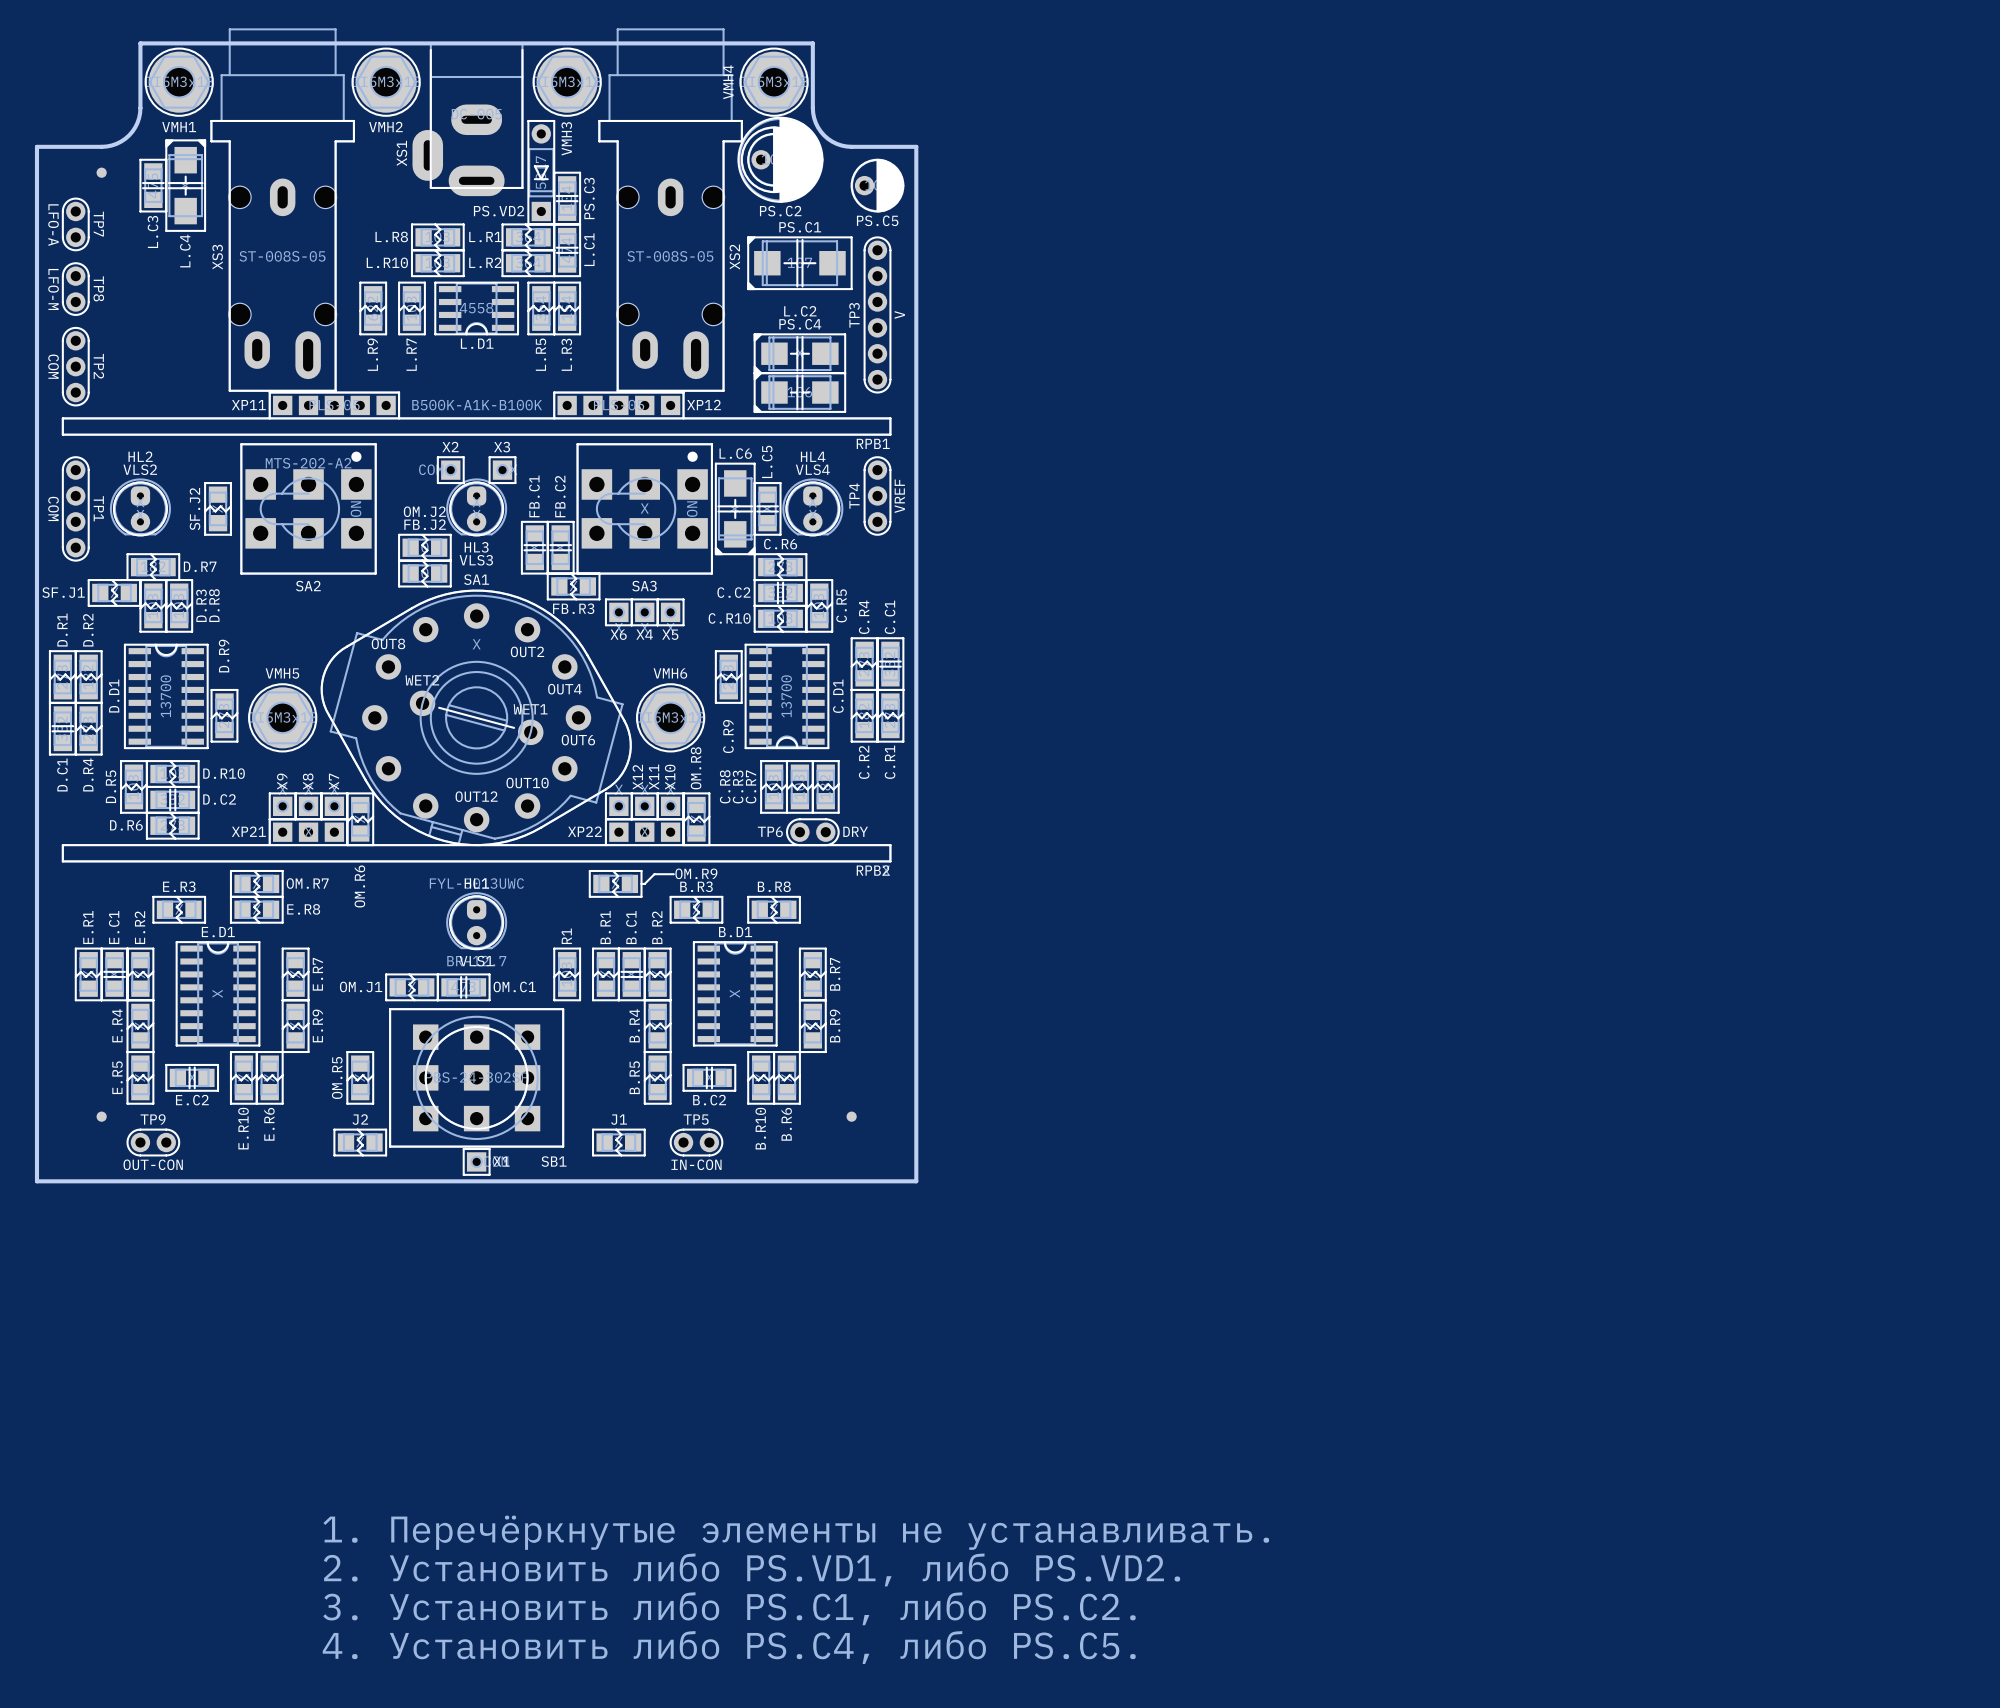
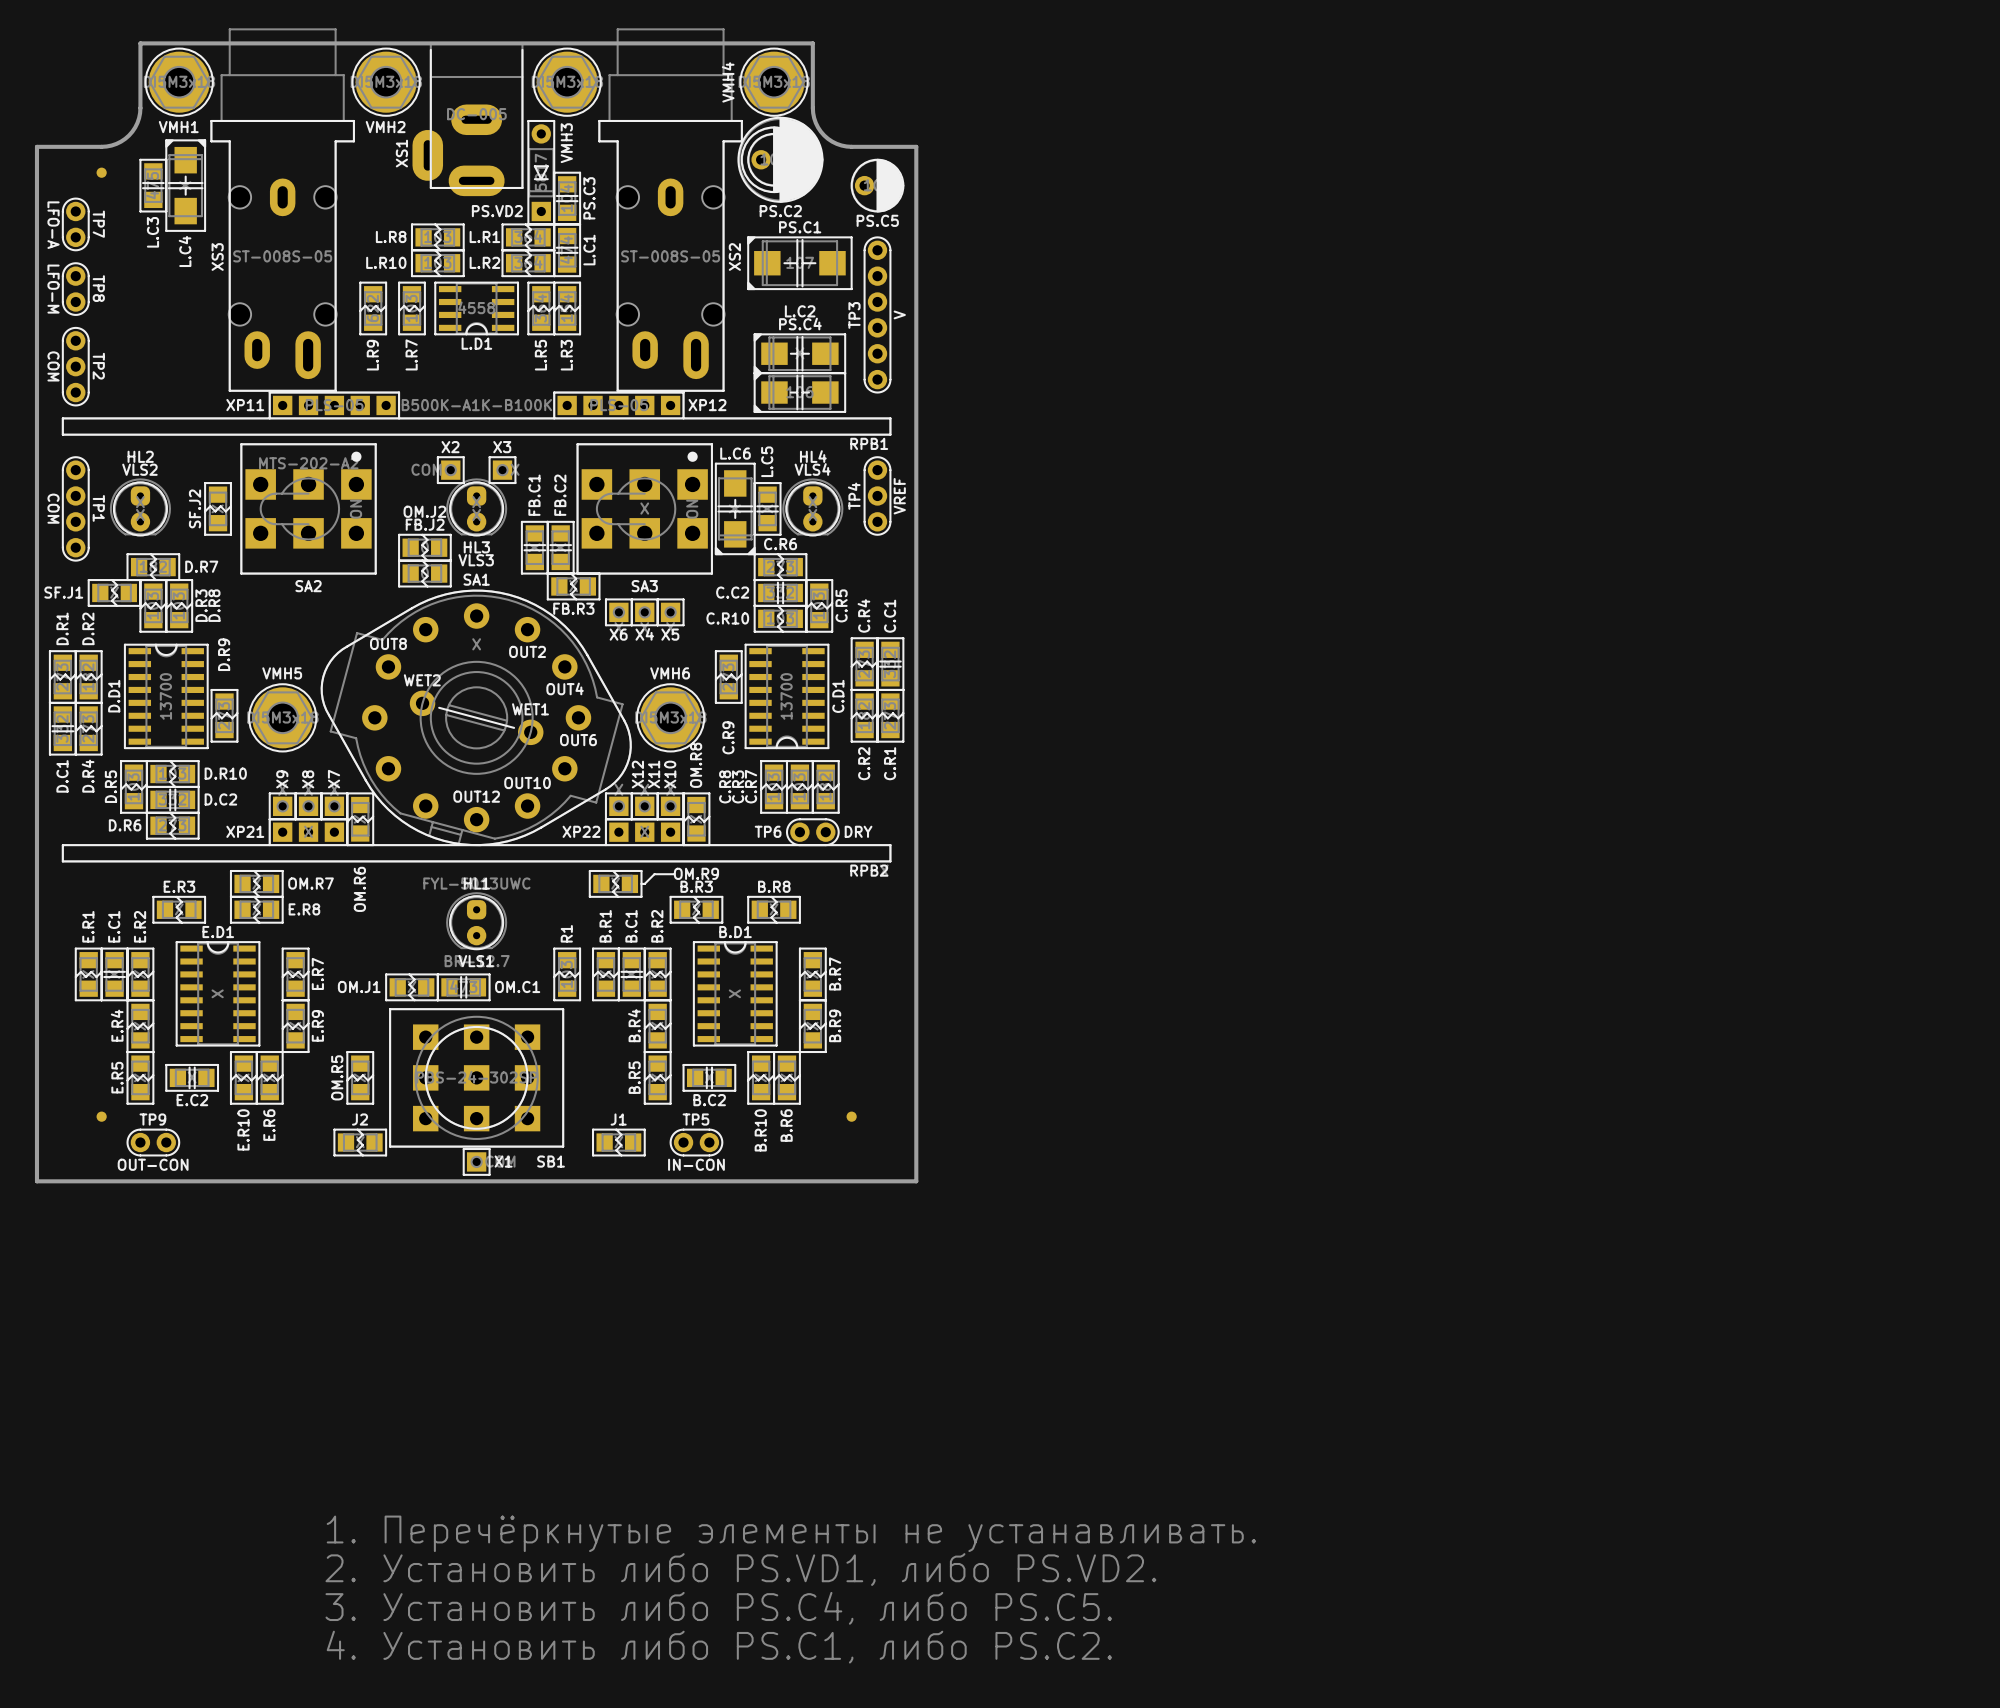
text: 3. Установить либо PS.C1, либо PS.C2. (729, 1608) -> 3. Установить либо PS.C4, либо PS.C5. (718, 1608)
text: 4. Установить либо PS.C4, либо PS.C5. (729, 1647) -> 4. Установить либо PS.C1, либо PS.C2. (719, 1647)

